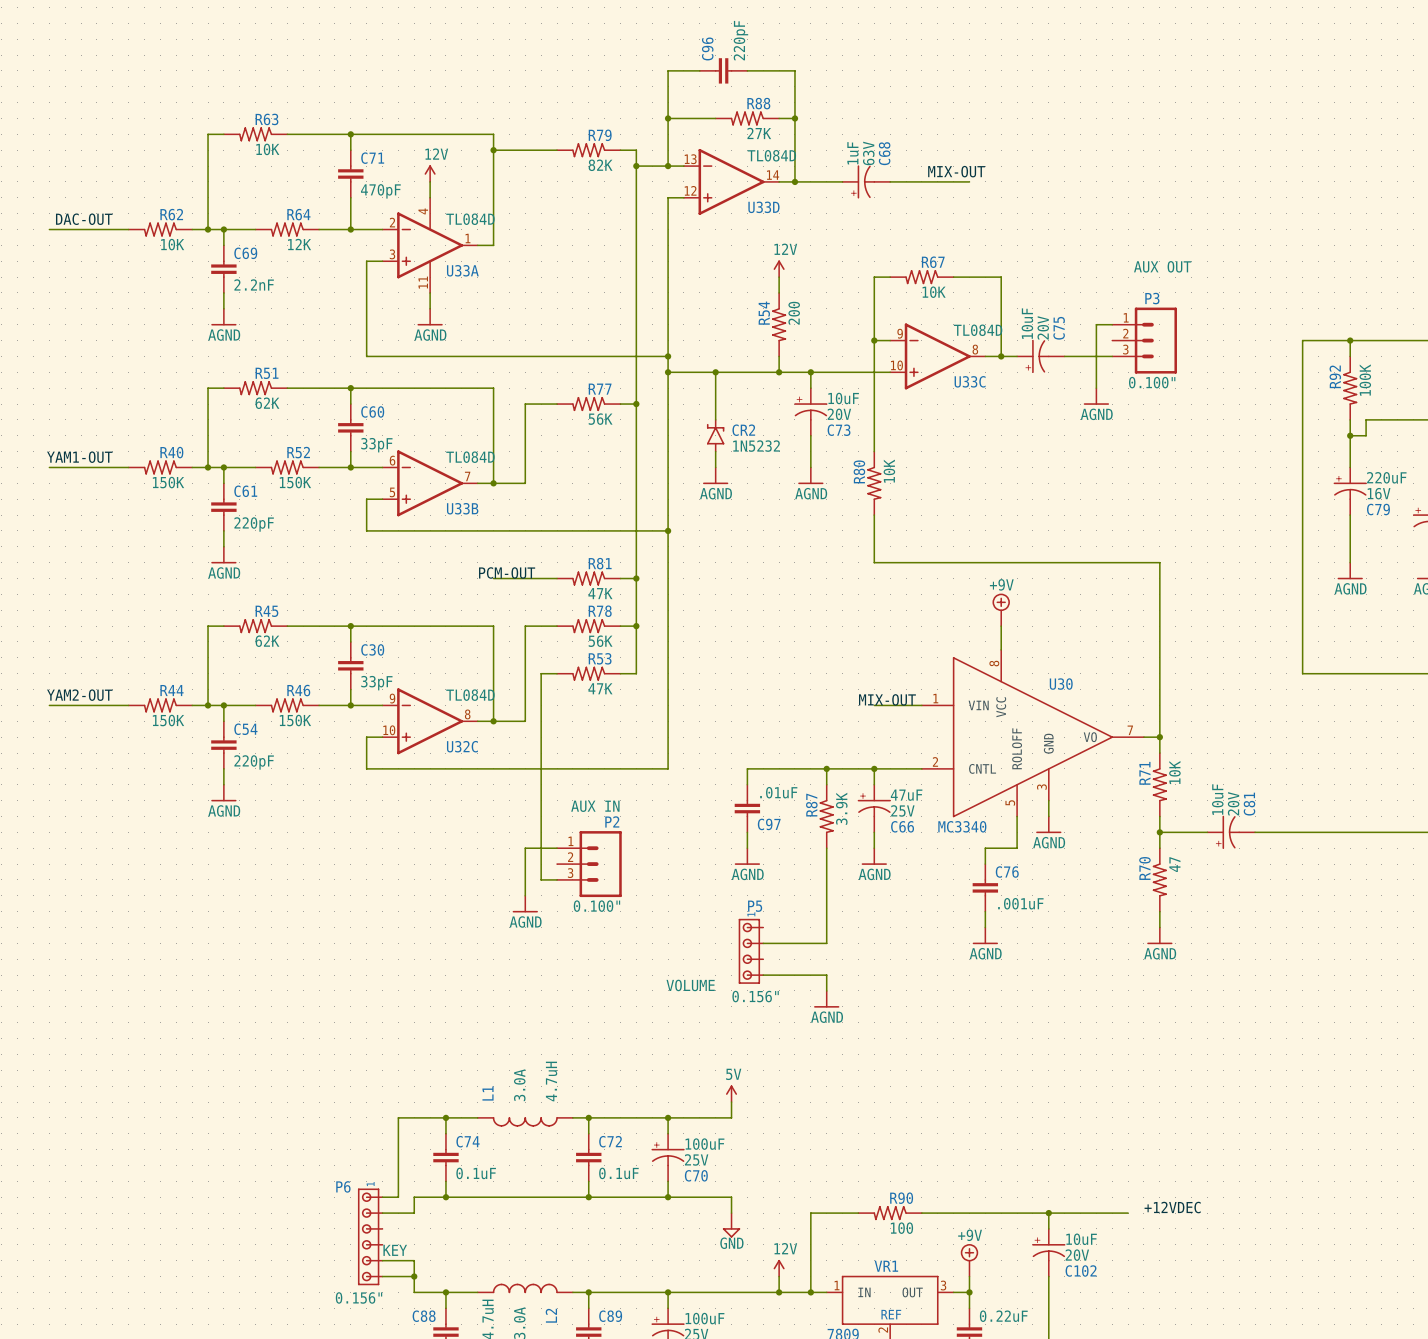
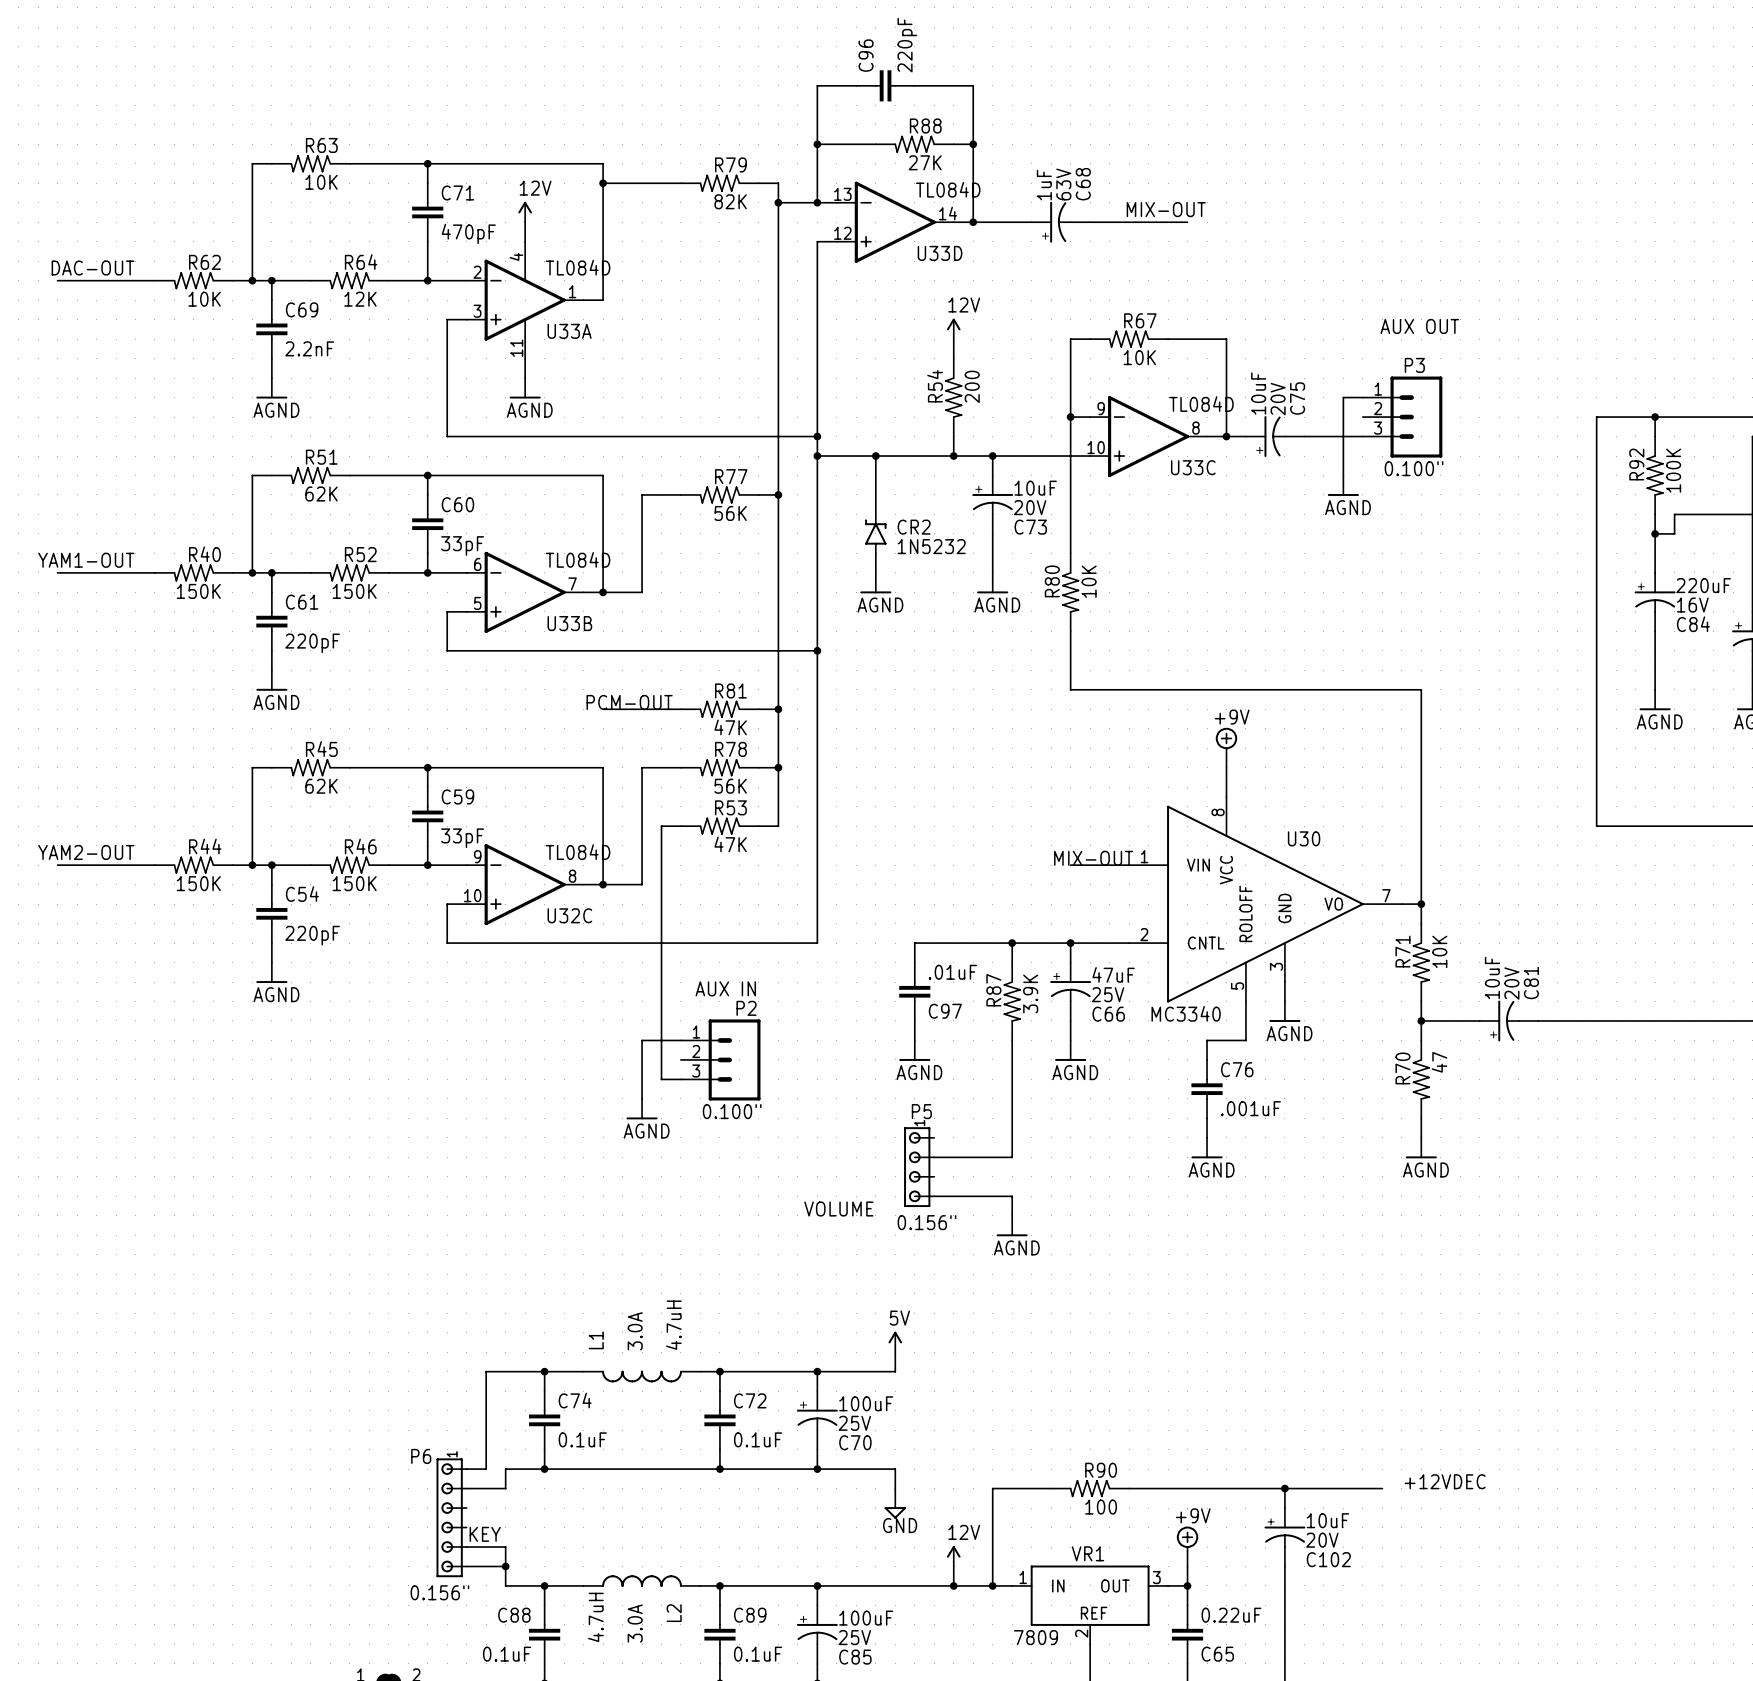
C79 name: C79 (1378, 509) -> C84 (1693, 624)
C30 name: C30 (372, 649) -> C59 (457, 796)

